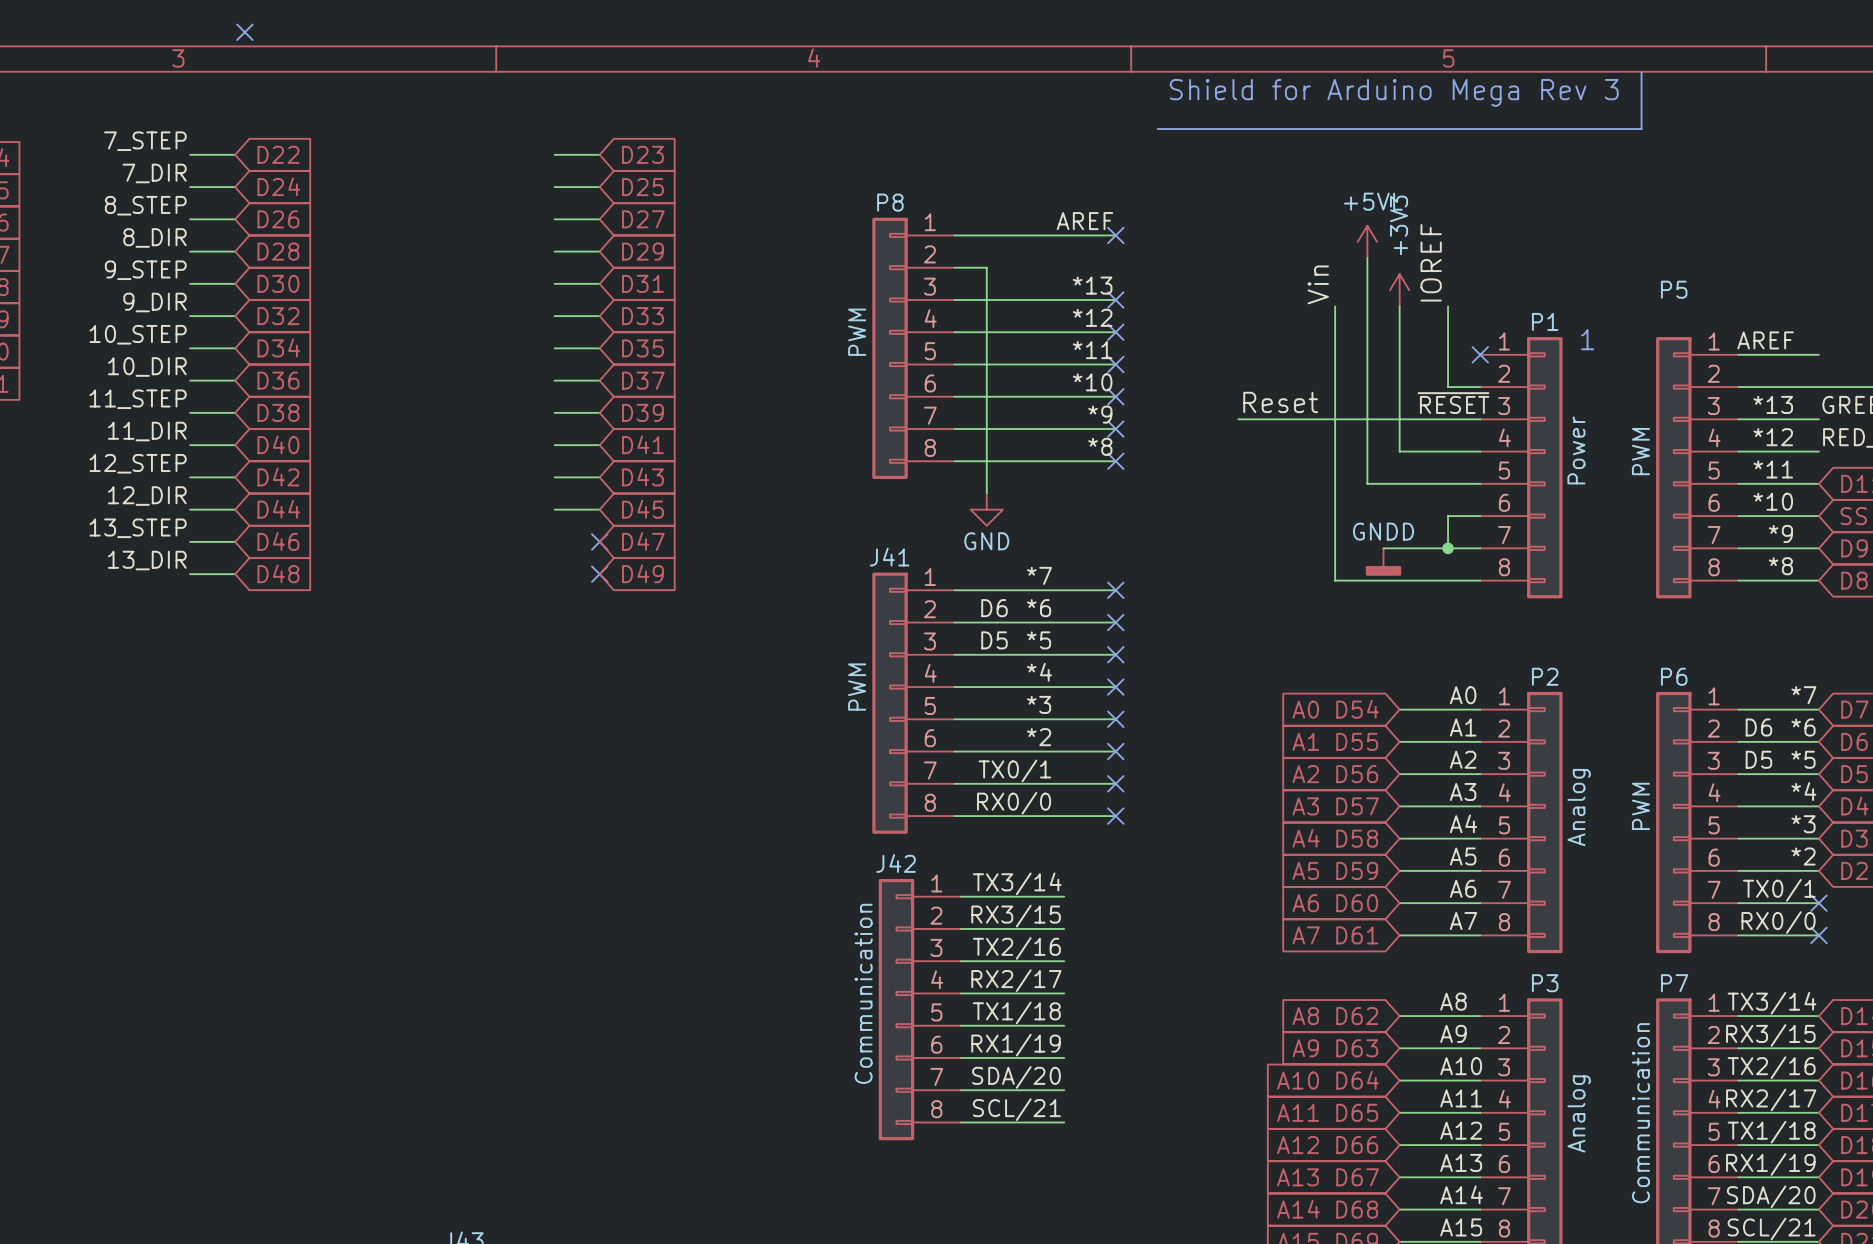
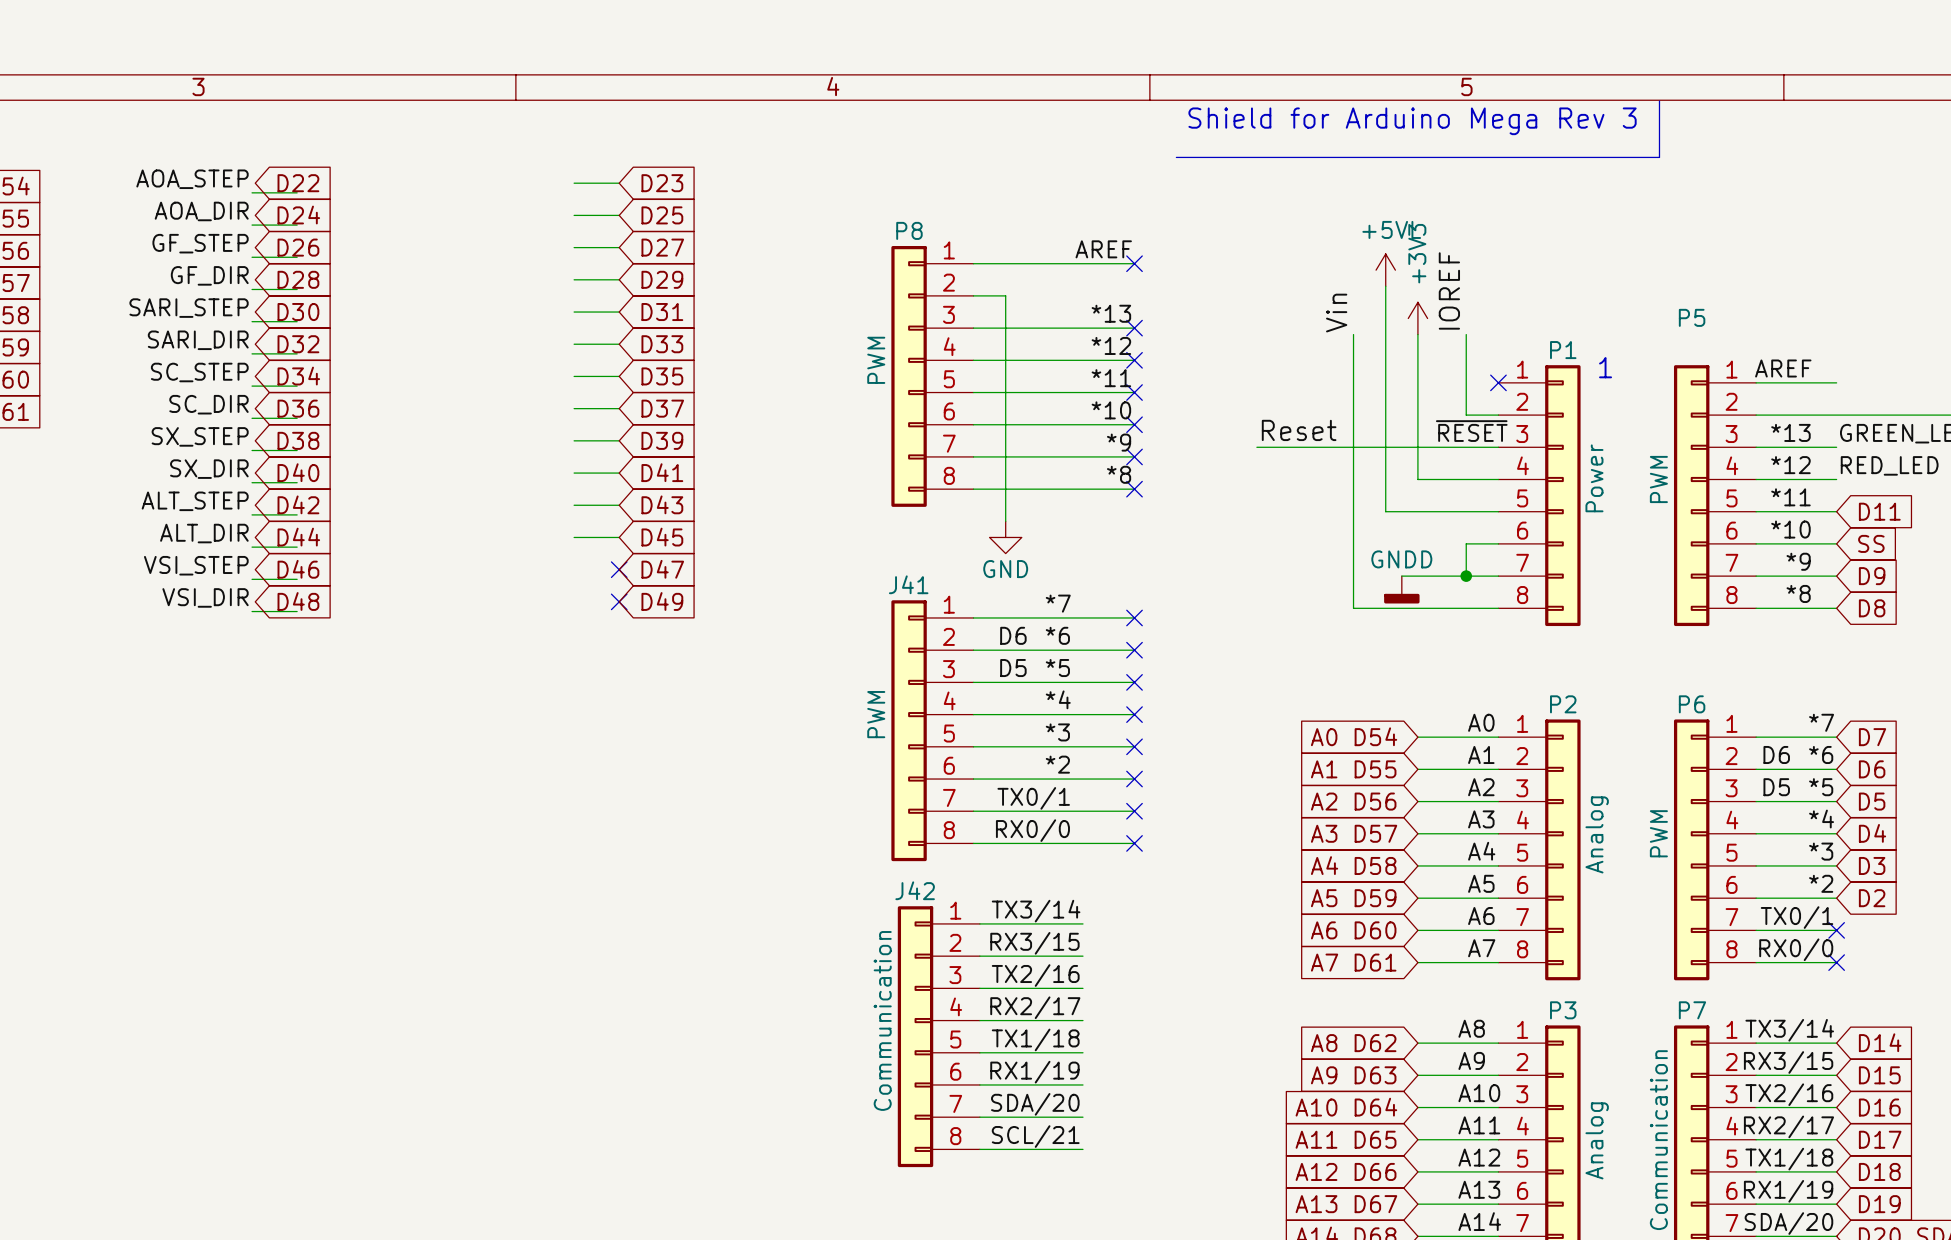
no-connect mark: (244, 32) -> none
label: 7_STEP (145, 141) -> AOA_STEP (192, 179)
wire: (190, 154) (235, 154) -> (252, 192) (297, 192)
label: 7_DIR (154, 173) -> AOA_DIR (201, 211)
wire: (190, 187) (235, 187) -> (252, 225) (297, 225)
label: 8_STEP (145, 205) -> GF_STEP (200, 243)
wire: (190, 219) (235, 219) -> (252, 257) (297, 257)
label: 8_DIR (155, 237) -> GF_DIR (209, 275)
wire: (190, 251) (235, 251) -> (252, 289) (297, 289)
label: 9_STEP (145, 270) -> SARI_STEP (189, 308)
wire: (190, 283) (235, 283) -> (252, 321) (297, 321)
label: 9_DIR (155, 302) -> SARI_DIR (198, 340)
wire: (190, 316) (235, 316) -> (252, 353) (297, 353)
label: 10_STEP (138, 334) -> SC_STEP (199, 372)
wire: (190, 348) (235, 348) -> (252, 386) (297, 386)
label: 10_DIR (147, 366) -> SC_DIR (208, 404)
wire: (190, 380) (235, 380) -> (252, 418) (297, 418)
label: 11_STEP (138, 399) -> SX_STEP (200, 436)
wire: (190, 412) (235, 412) -> (252, 450) (297, 450)
label: 11_DIR (147, 431) -> SX_DIR (209, 469)
wire: (190, 445) (235, 445) -> (252, 482) (297, 482)
label: 12_STEP (138, 463) -> ALT_STEP (195, 501)
wire: (190, 477) (235, 477) -> (252, 514) (297, 514)
label: 12_DIR (147, 496) -> ALT_DIR (204, 533)
wire: (190, 509) (235, 509) -> (252, 547) (297, 547)
label: 13_STEP (138, 528) -> VSI_STEP (196, 565)
wire: (190, 541) (235, 541) -> (252, 579) (297, 579)
label: 13_DIR (147, 560) -> VSI_DIR (205, 597)
wire: (190, 574) (235, 574) -> (252, 611) (297, 611)

